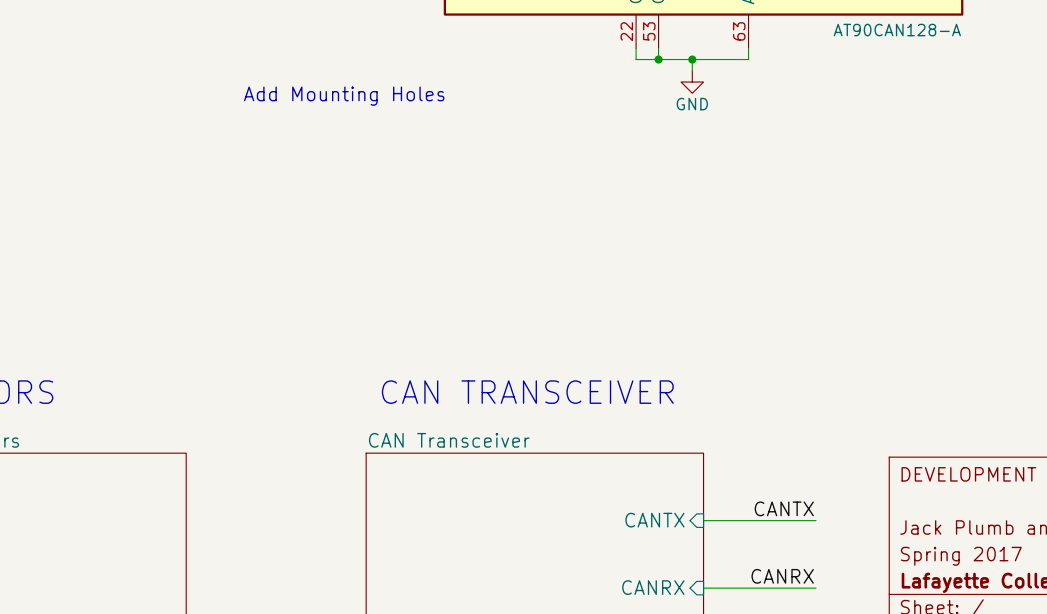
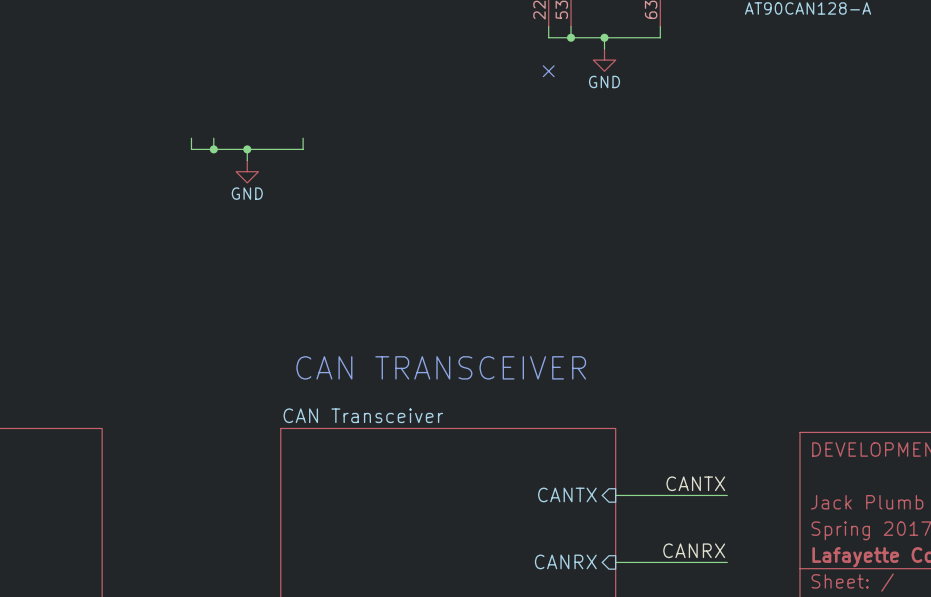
no-connect mark: none -> (548, 71)
text: Add Mounting Holes (344, 96) -> none
wire: none -> (191, 138) (191, 149) (303, 149) (303, 138)
wire: none -> (213, 138) (213, 149)
junction: none -> (213, 149)
wire: none -> (247, 149) (247, 160)
junction: none -> (247, 149)
power symbol: none -> GND (247, 171)

